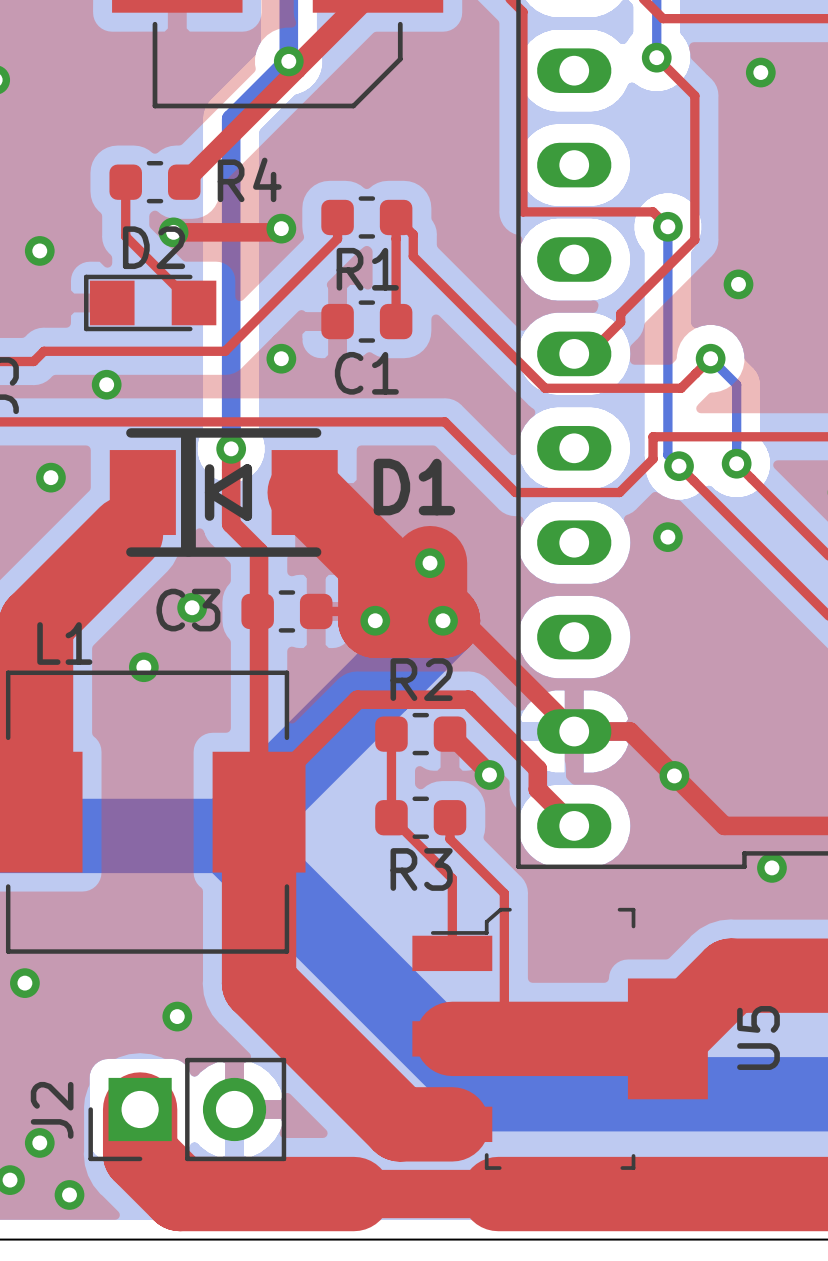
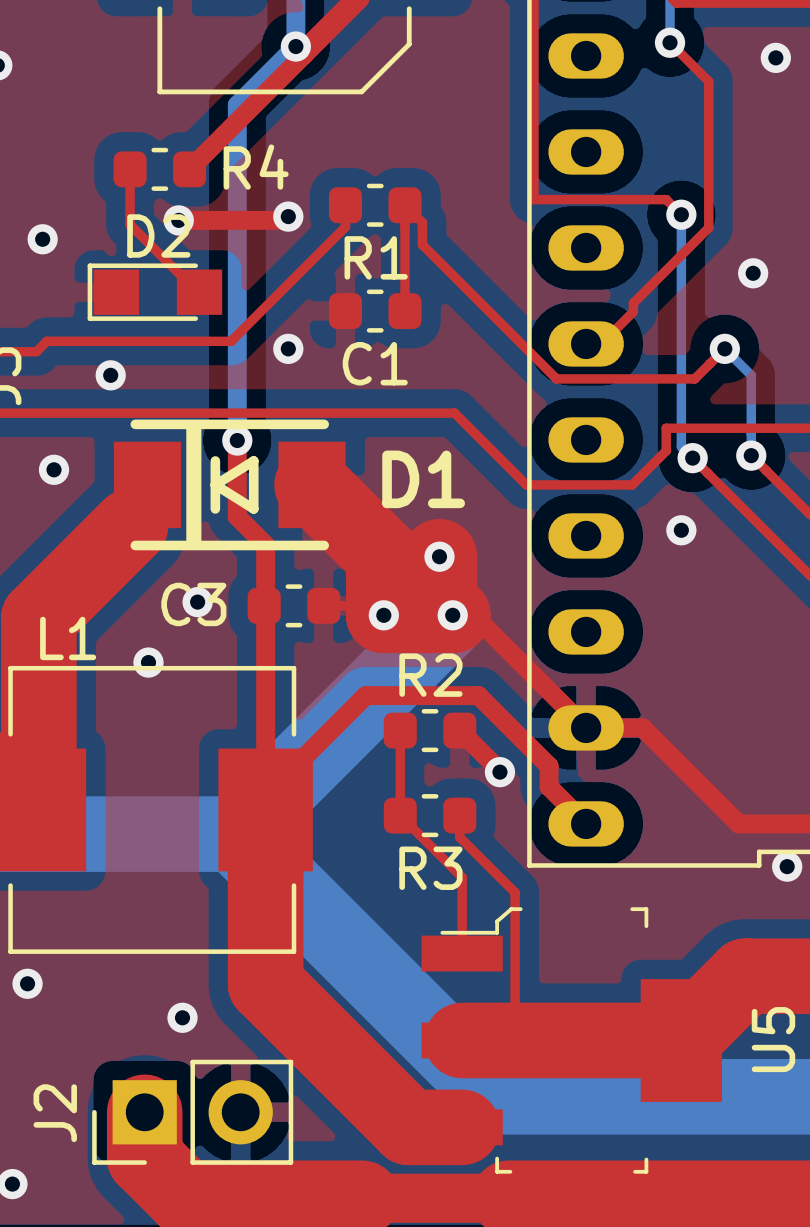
via: (674, 775) -> none
via: (39, 1142) -> none
via: (69, 1194) -> none

